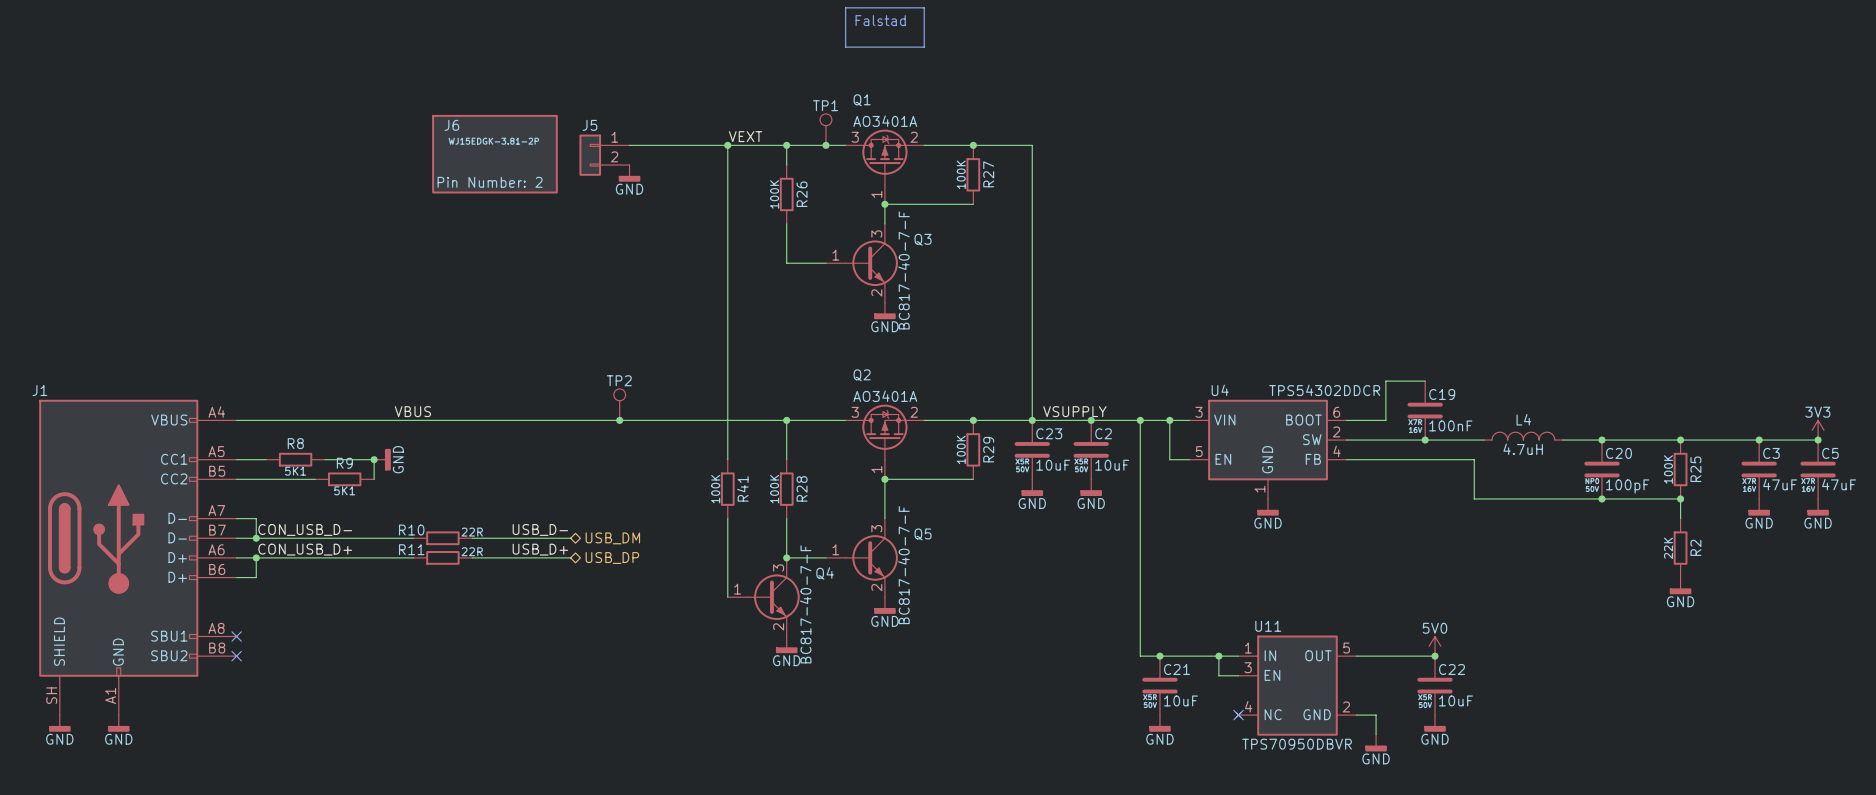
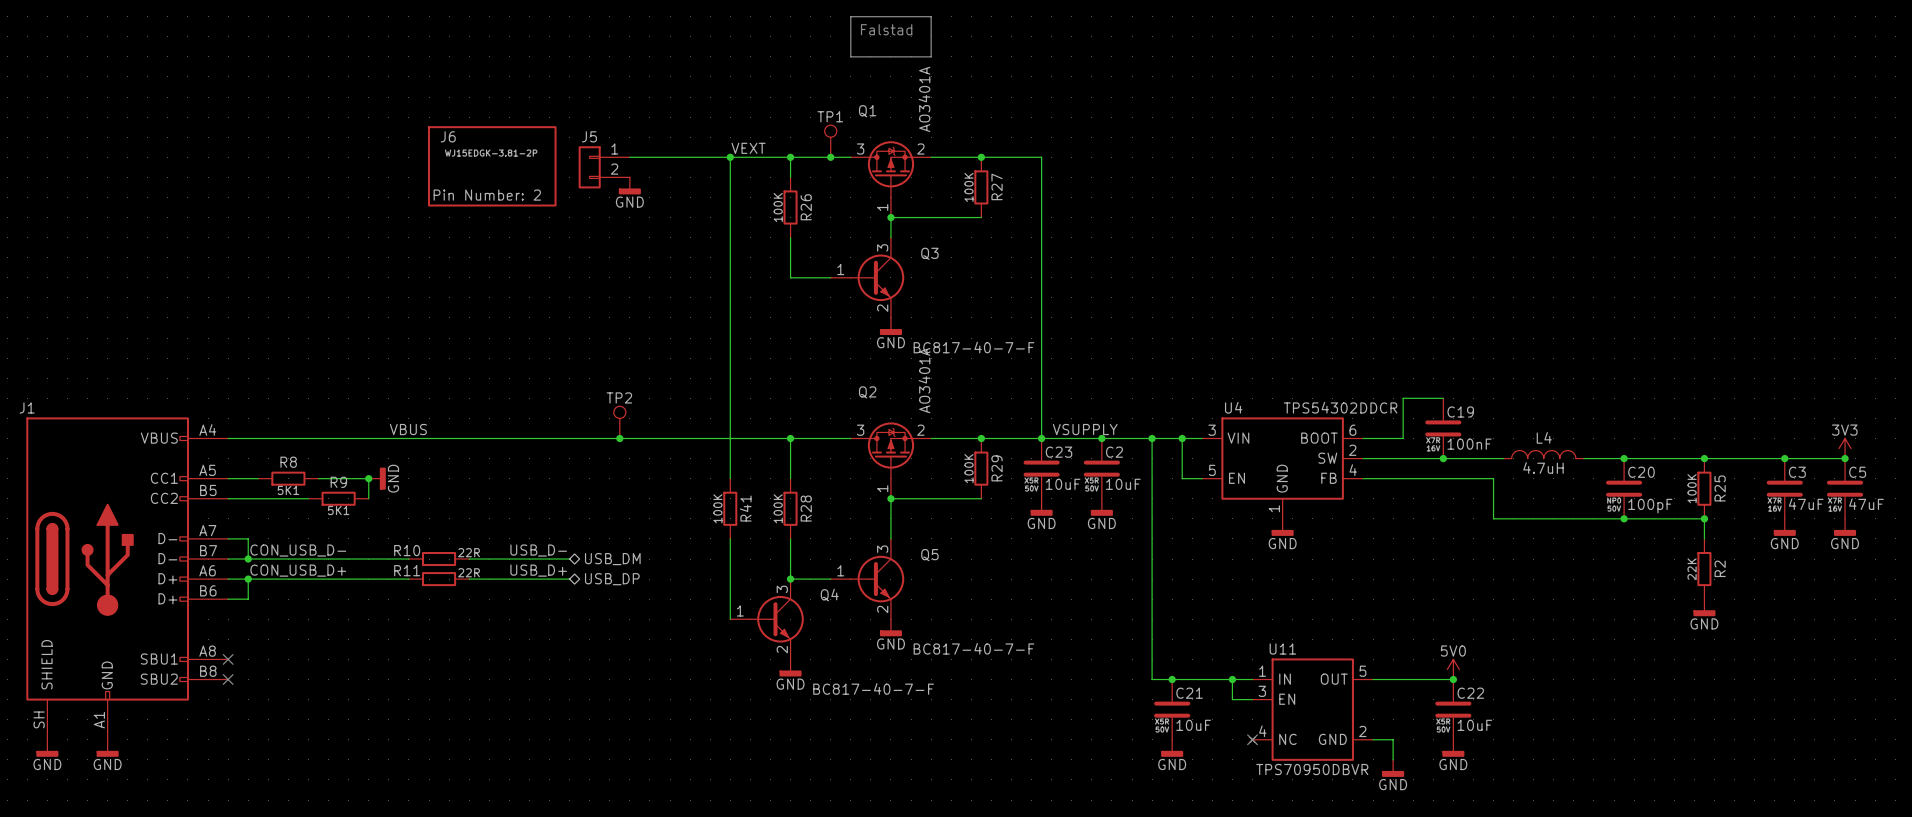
Q1 value rotation: 0° (885, 121) -> 90° counterclockwise (924, 99)
Q3 value rotation: 0° (903, 270) -> 90° clockwise (974, 347)
Q2 value rotation: 0° (885, 396) -> 90° counterclockwise (924, 380)
Q5 value rotation: 0° (903, 565) -> 90° clockwise (974, 648)
Q4 value rotation: 0° (805, 604) -> 90° clockwise (873, 688)

